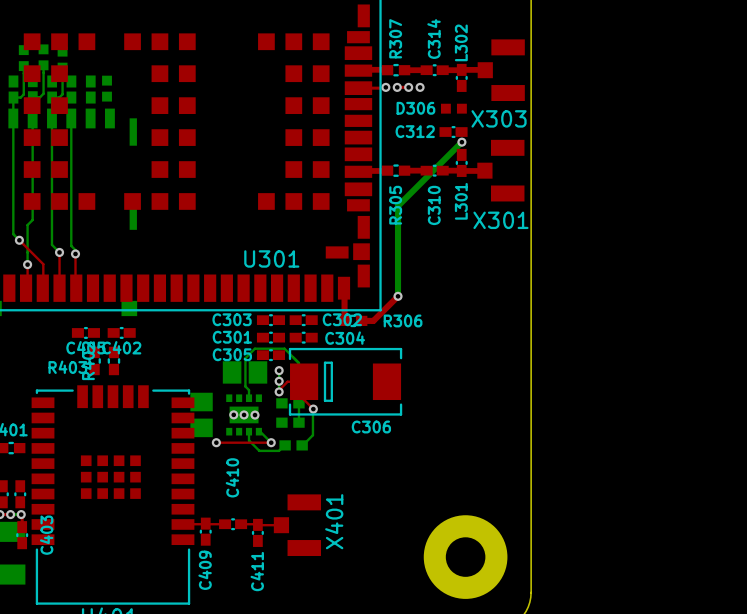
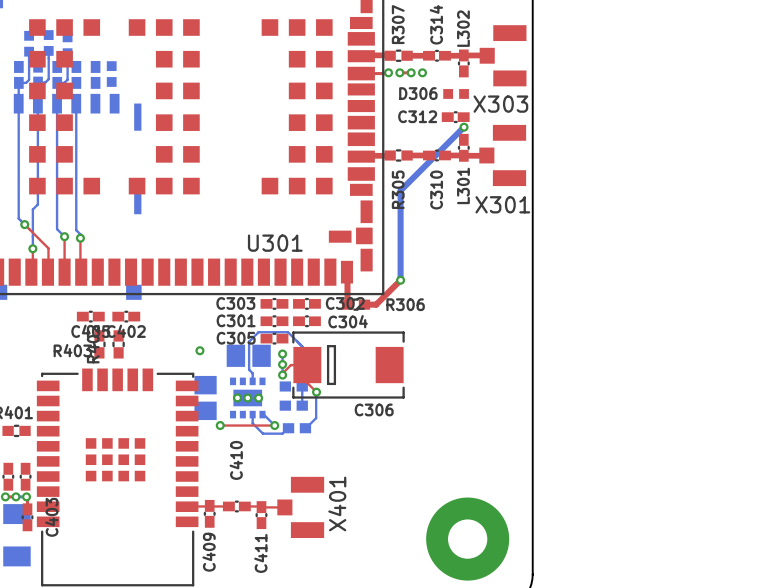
via: none -> (199, 350)

